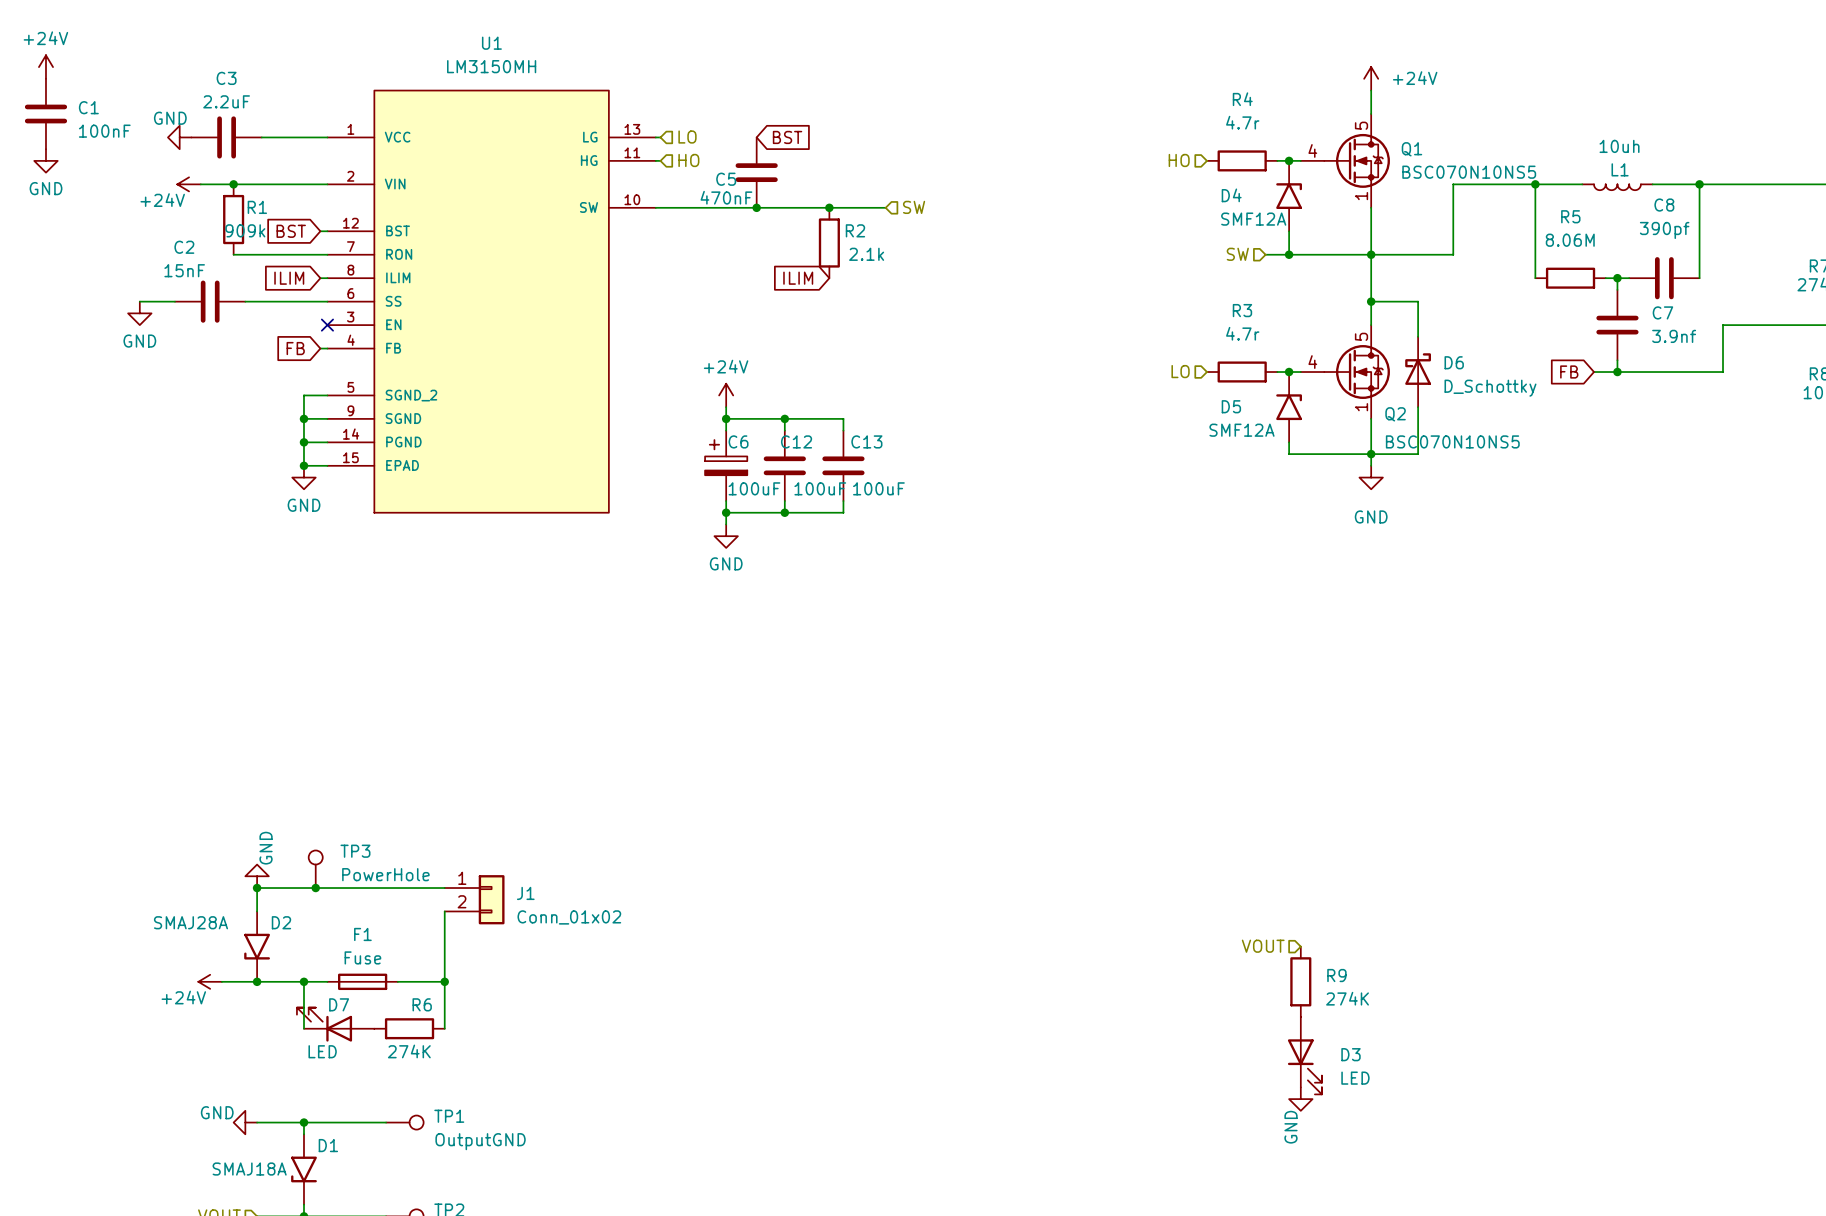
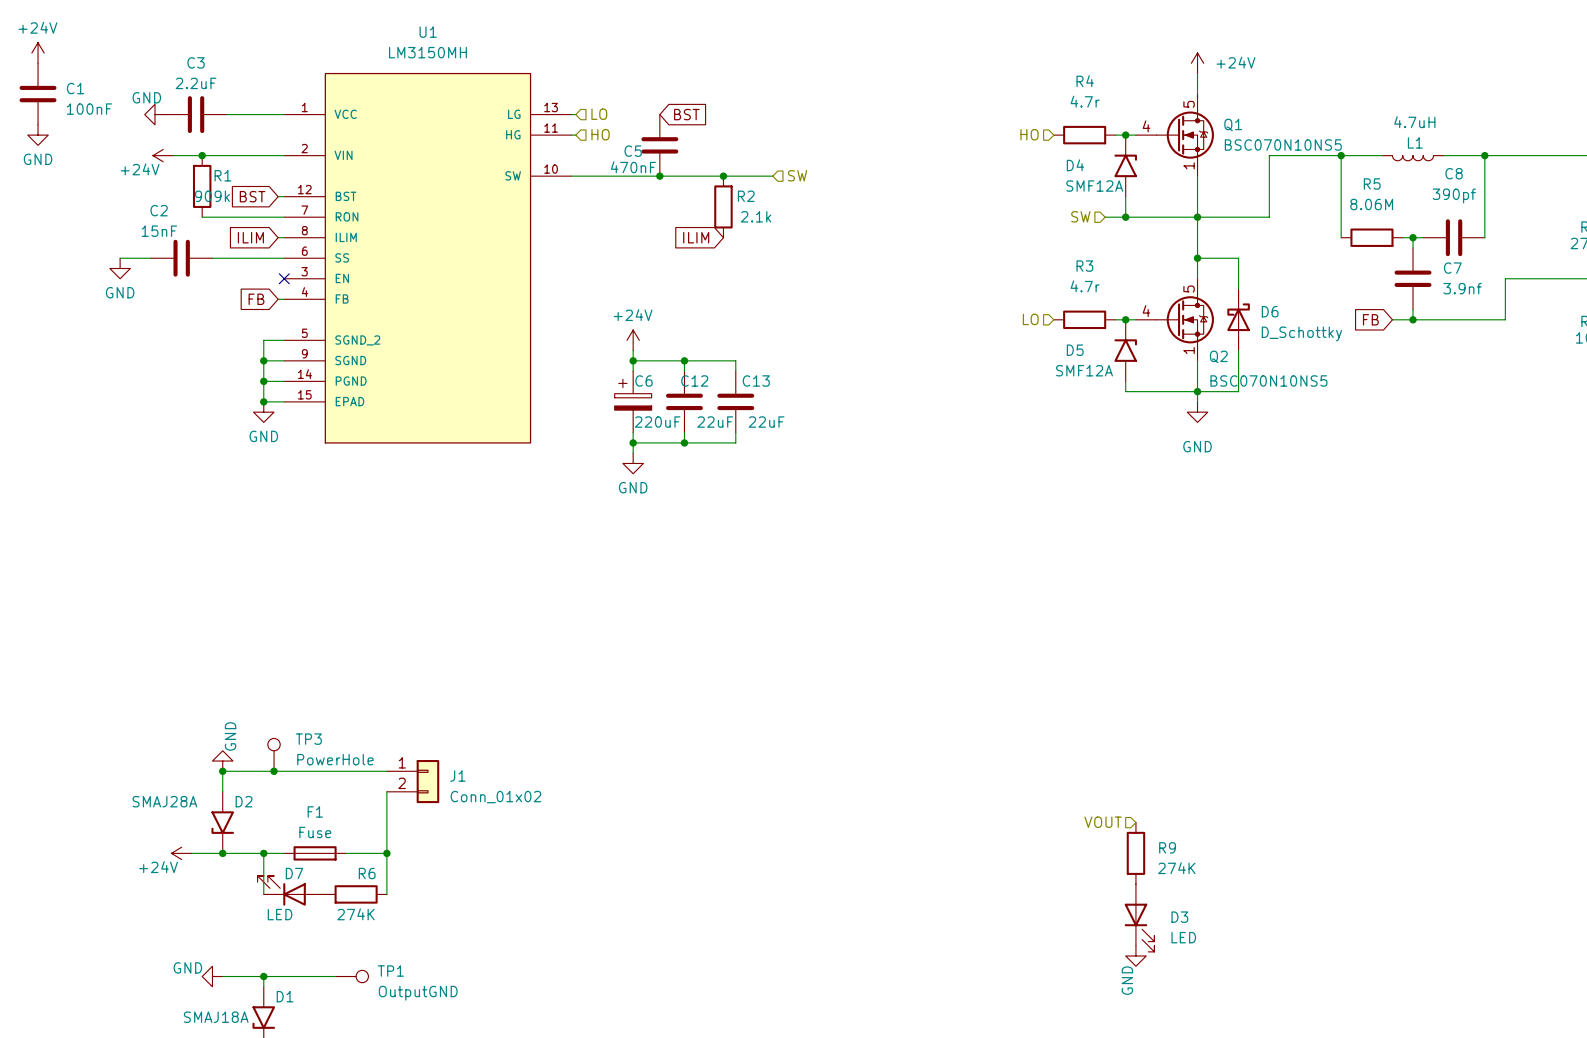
L1 value: 10uh (1619, 146) -> 4.7uH (1414, 122)
C6 value: 100uF (754, 488) -> 220uF (657, 422)
C12 value: 100uF (820, 488) -> 22uF (715, 422)
C13 value: 100uF (878, 488) -> 22uF (766, 422)

